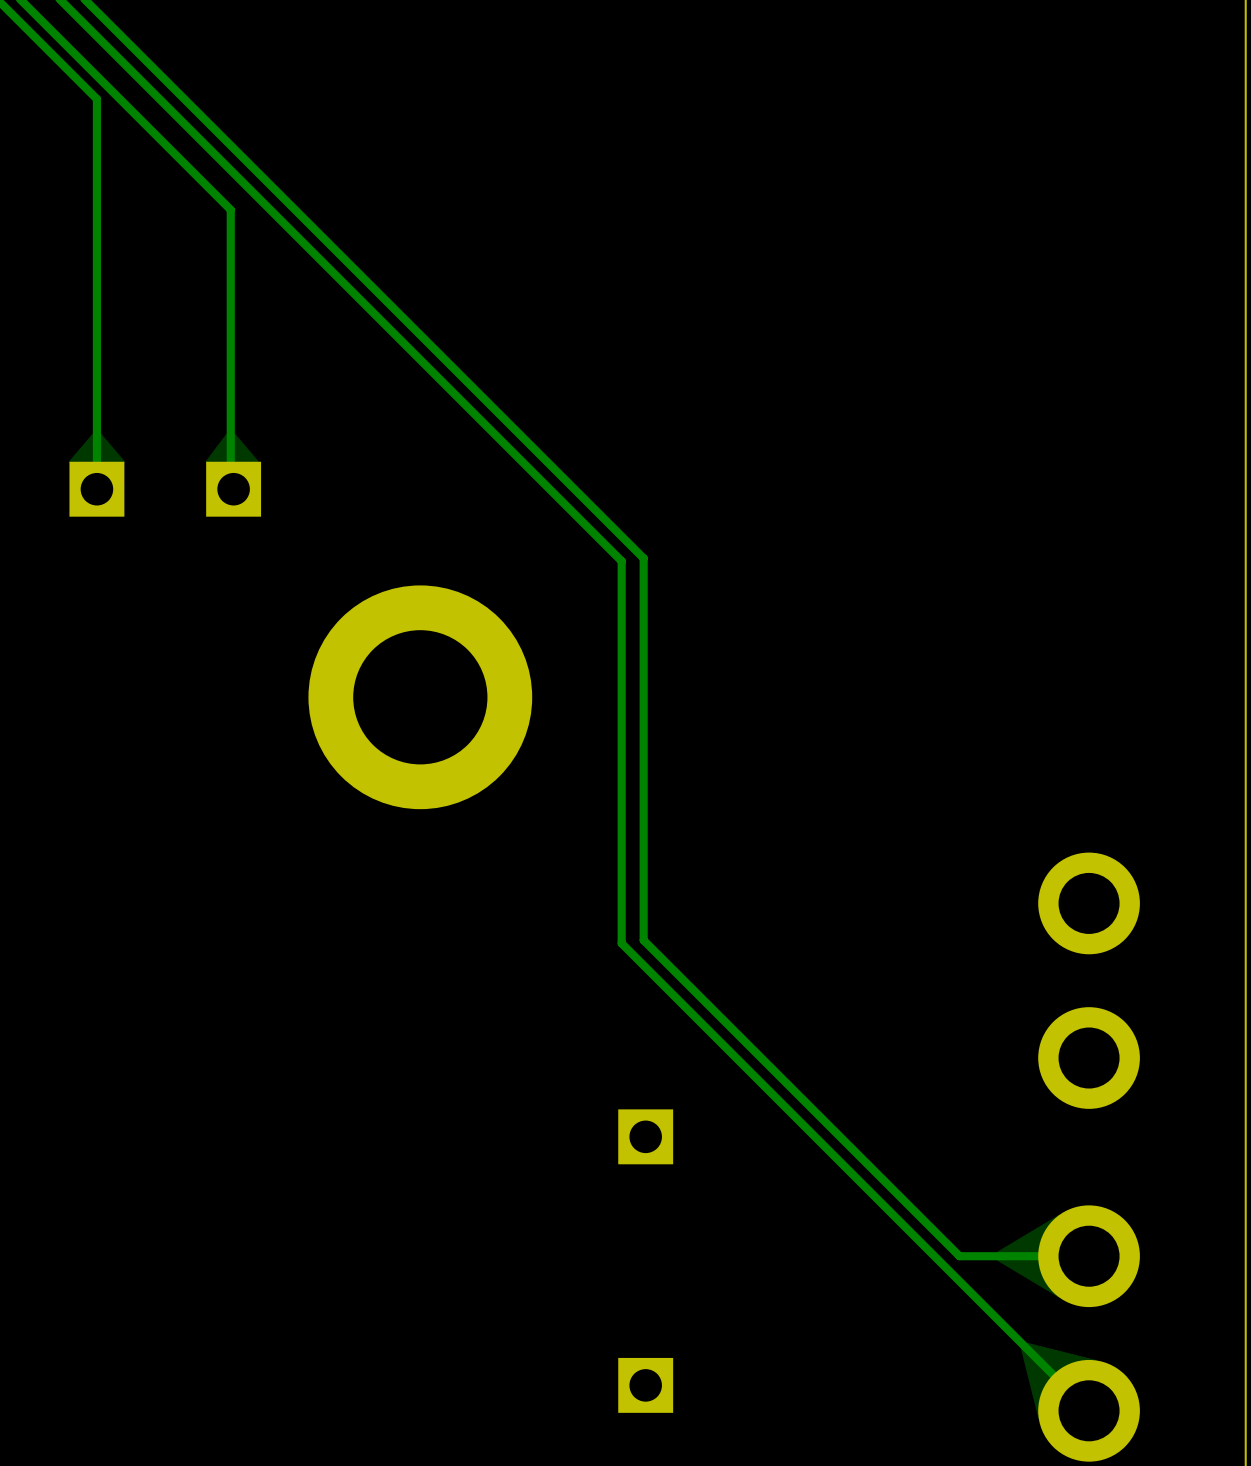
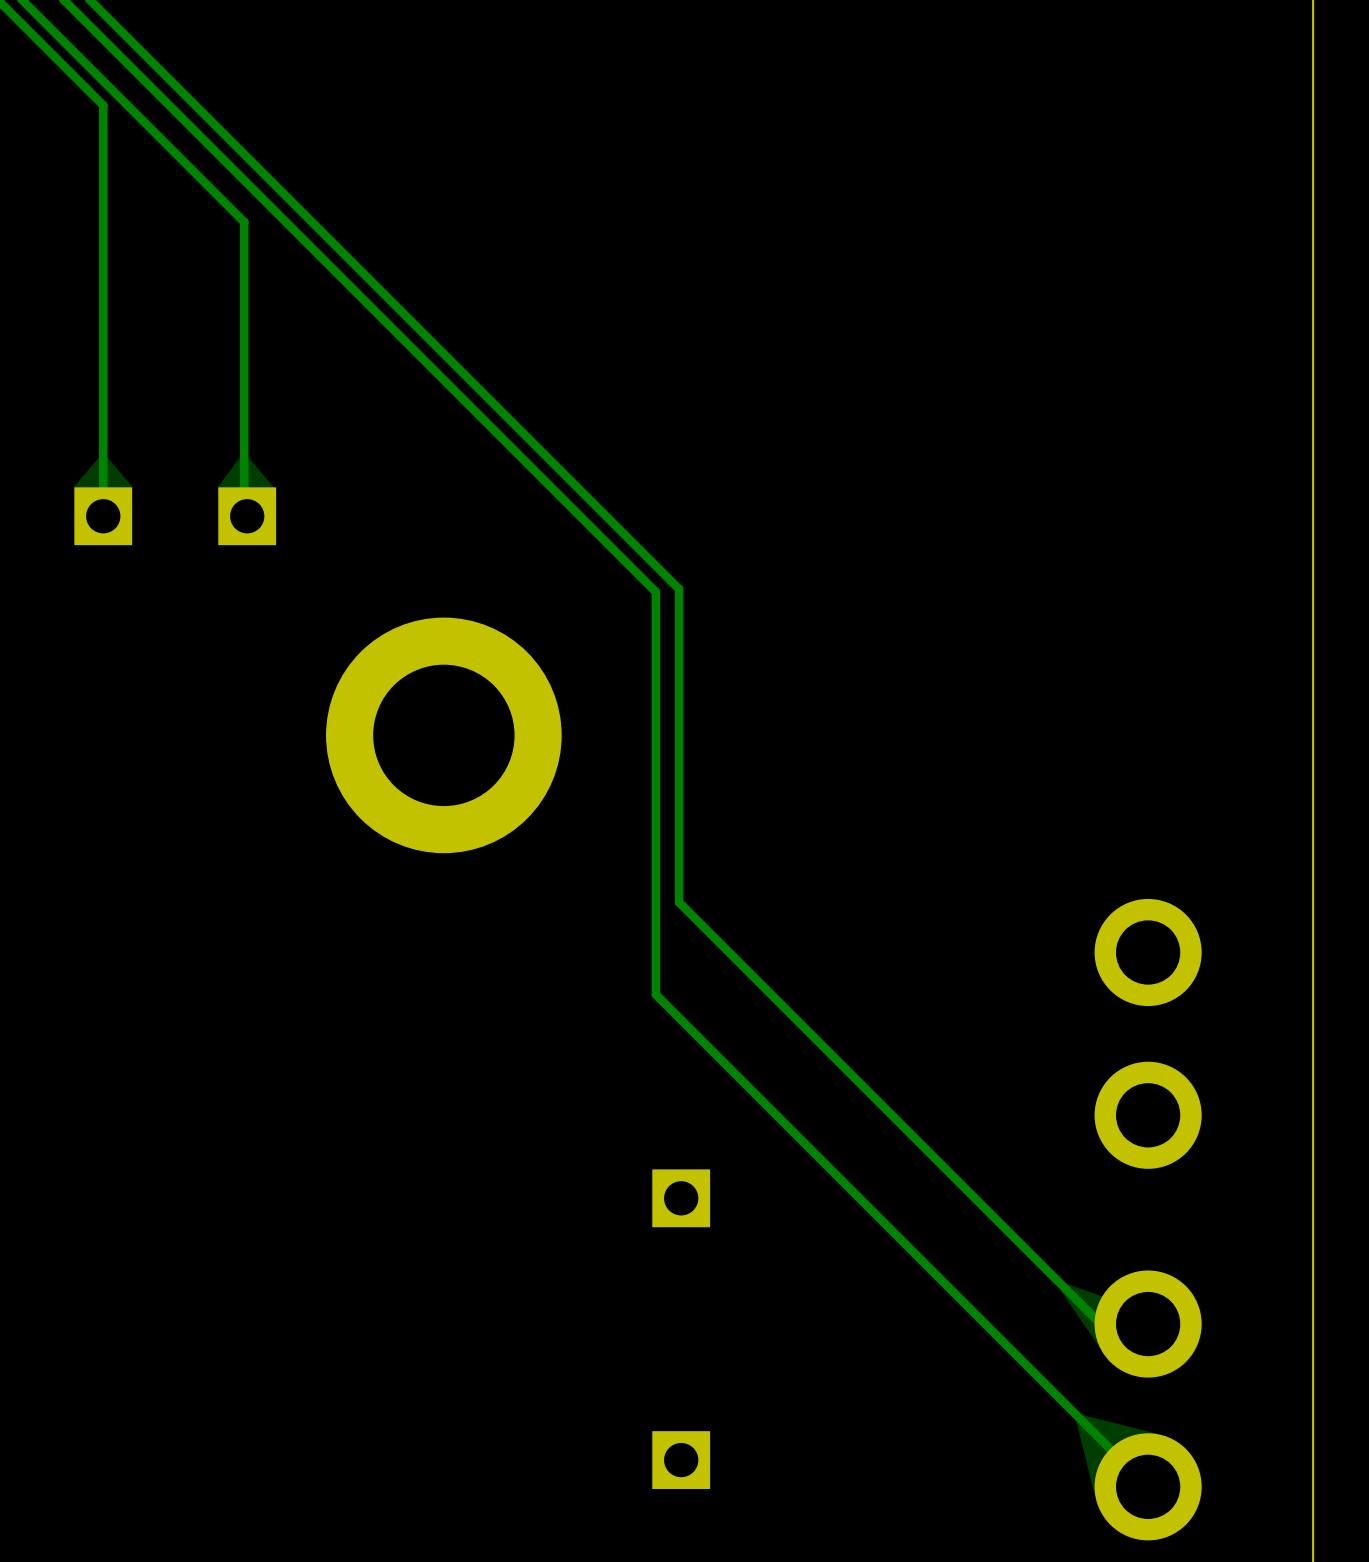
bottom track: (643, 855) (643, 940) (959, 1256) (1044, 1256) -> (679, 902) (1100, 1324)

